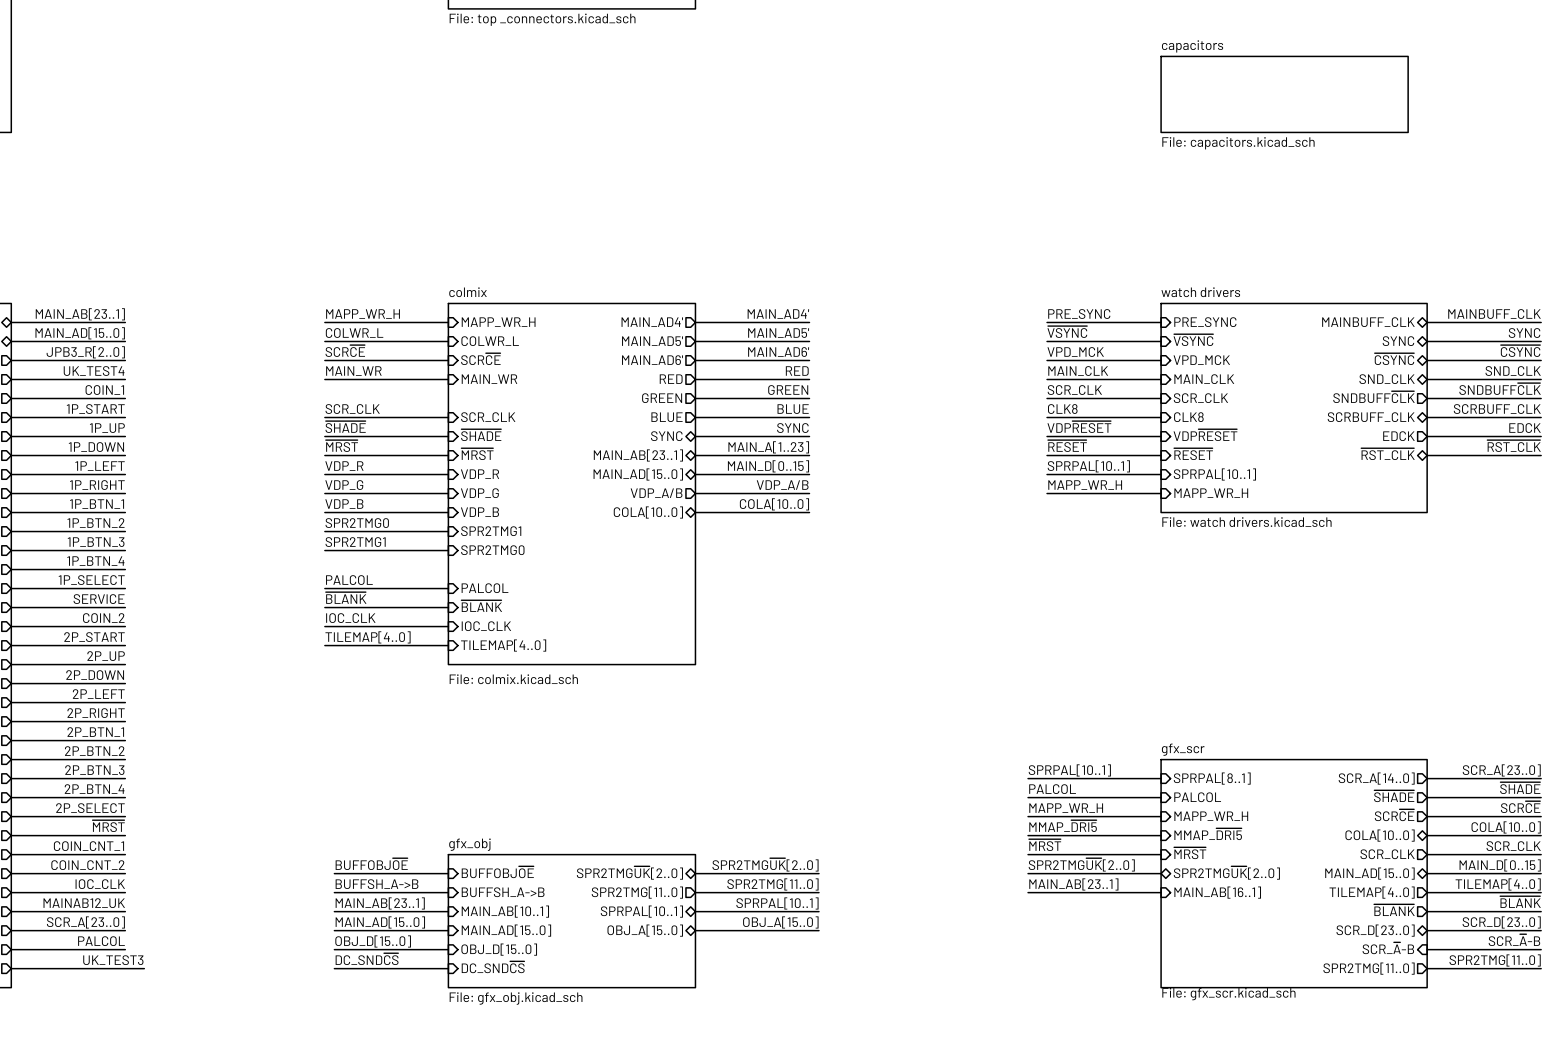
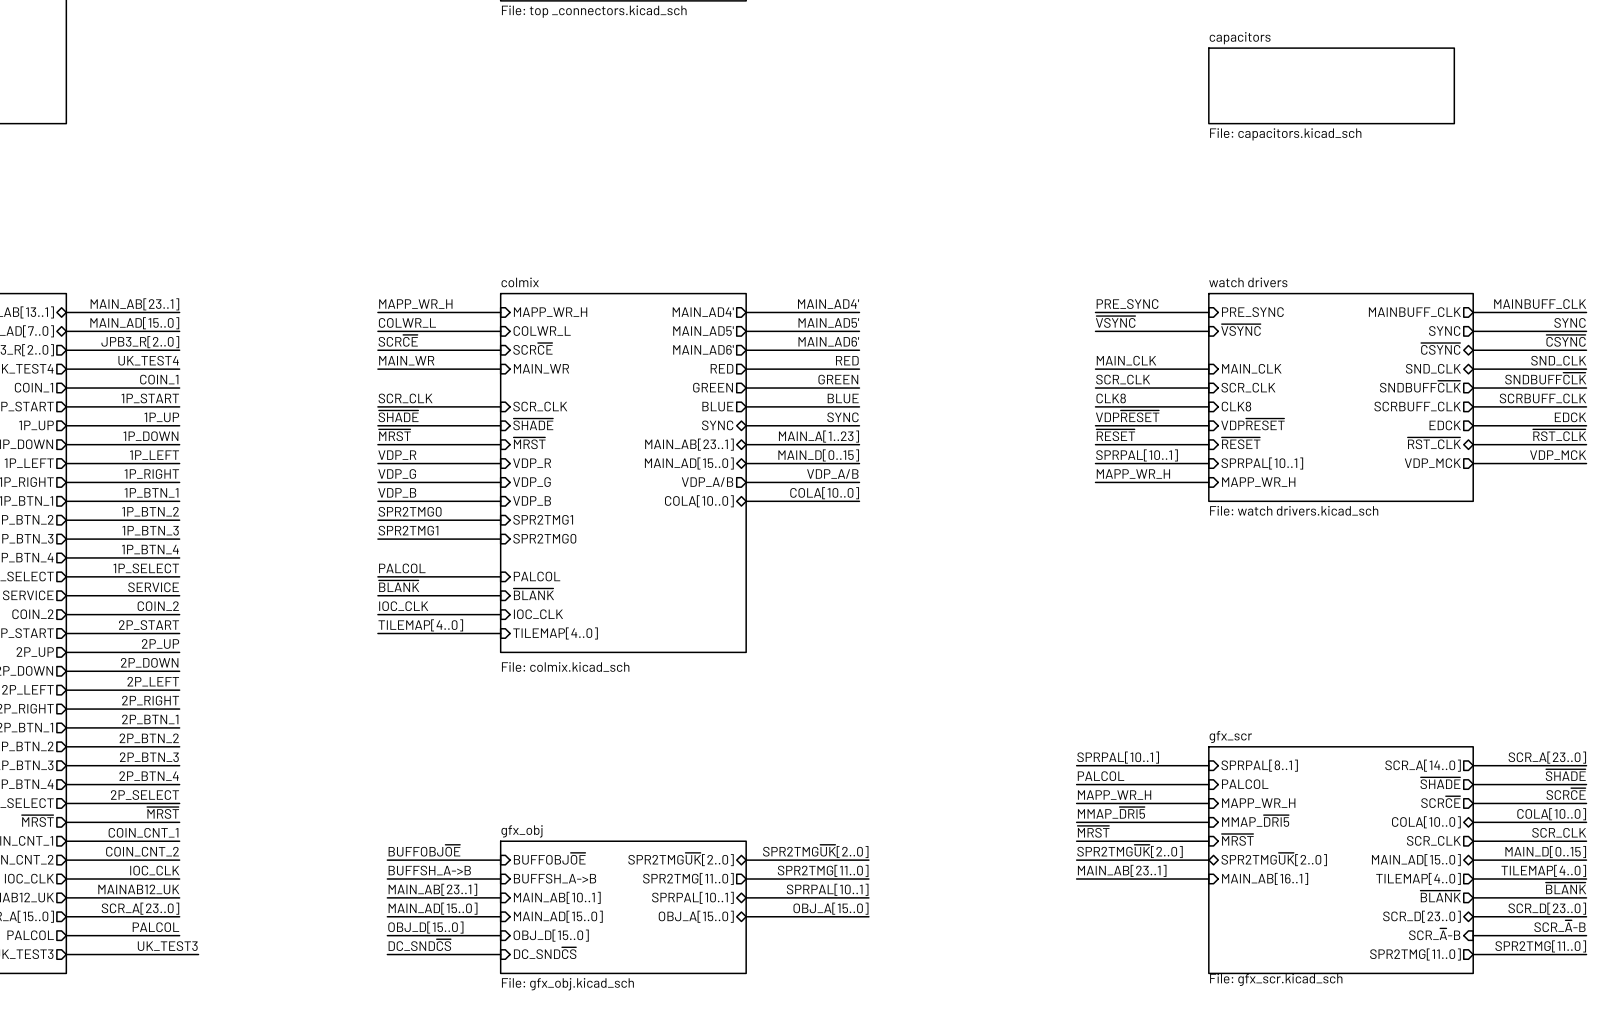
sheet pin shape: bidirectional (1368, 322) -> output (1414, 312)
sheet pin shape: bidirectional (1398, 341) -> output (1444, 331)
label: VPD_MCK (1075, 352) -> none
wire: (1047, 360) (1161, 360) -> none
sheet pin: VPD_MCK (1201, 360) -> none
sheet pin shape: bidirectional (1371, 417) -> output (1417, 406)
label: none -> VDP_MCK (1558, 455)
sheet pin: none -> VDP_MCK (1432, 463)
wire: none -> (1473, 463) (1586, 463)

